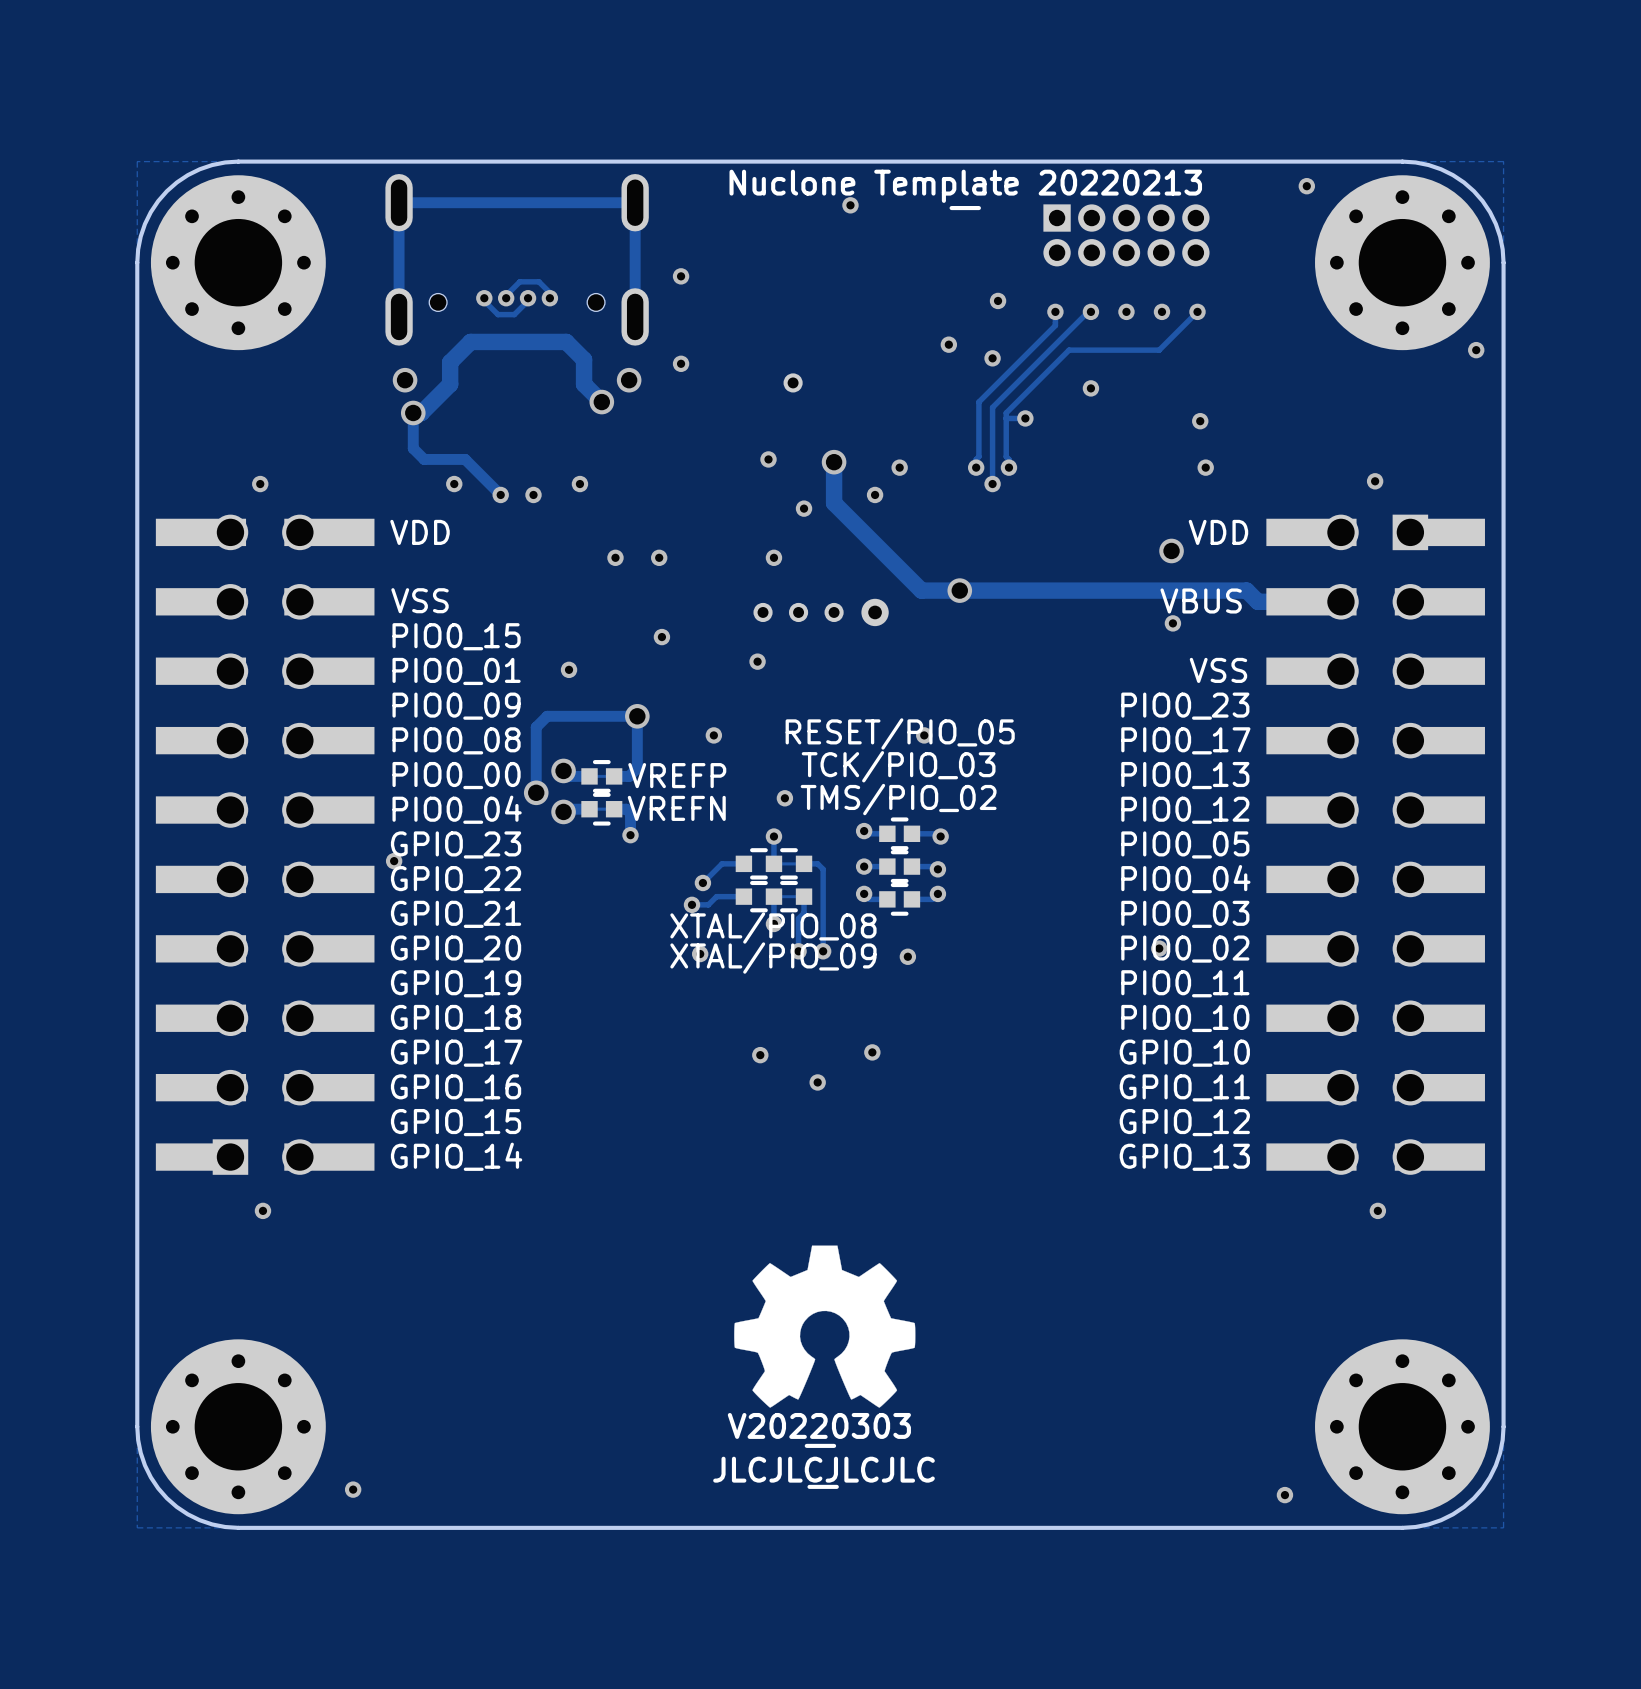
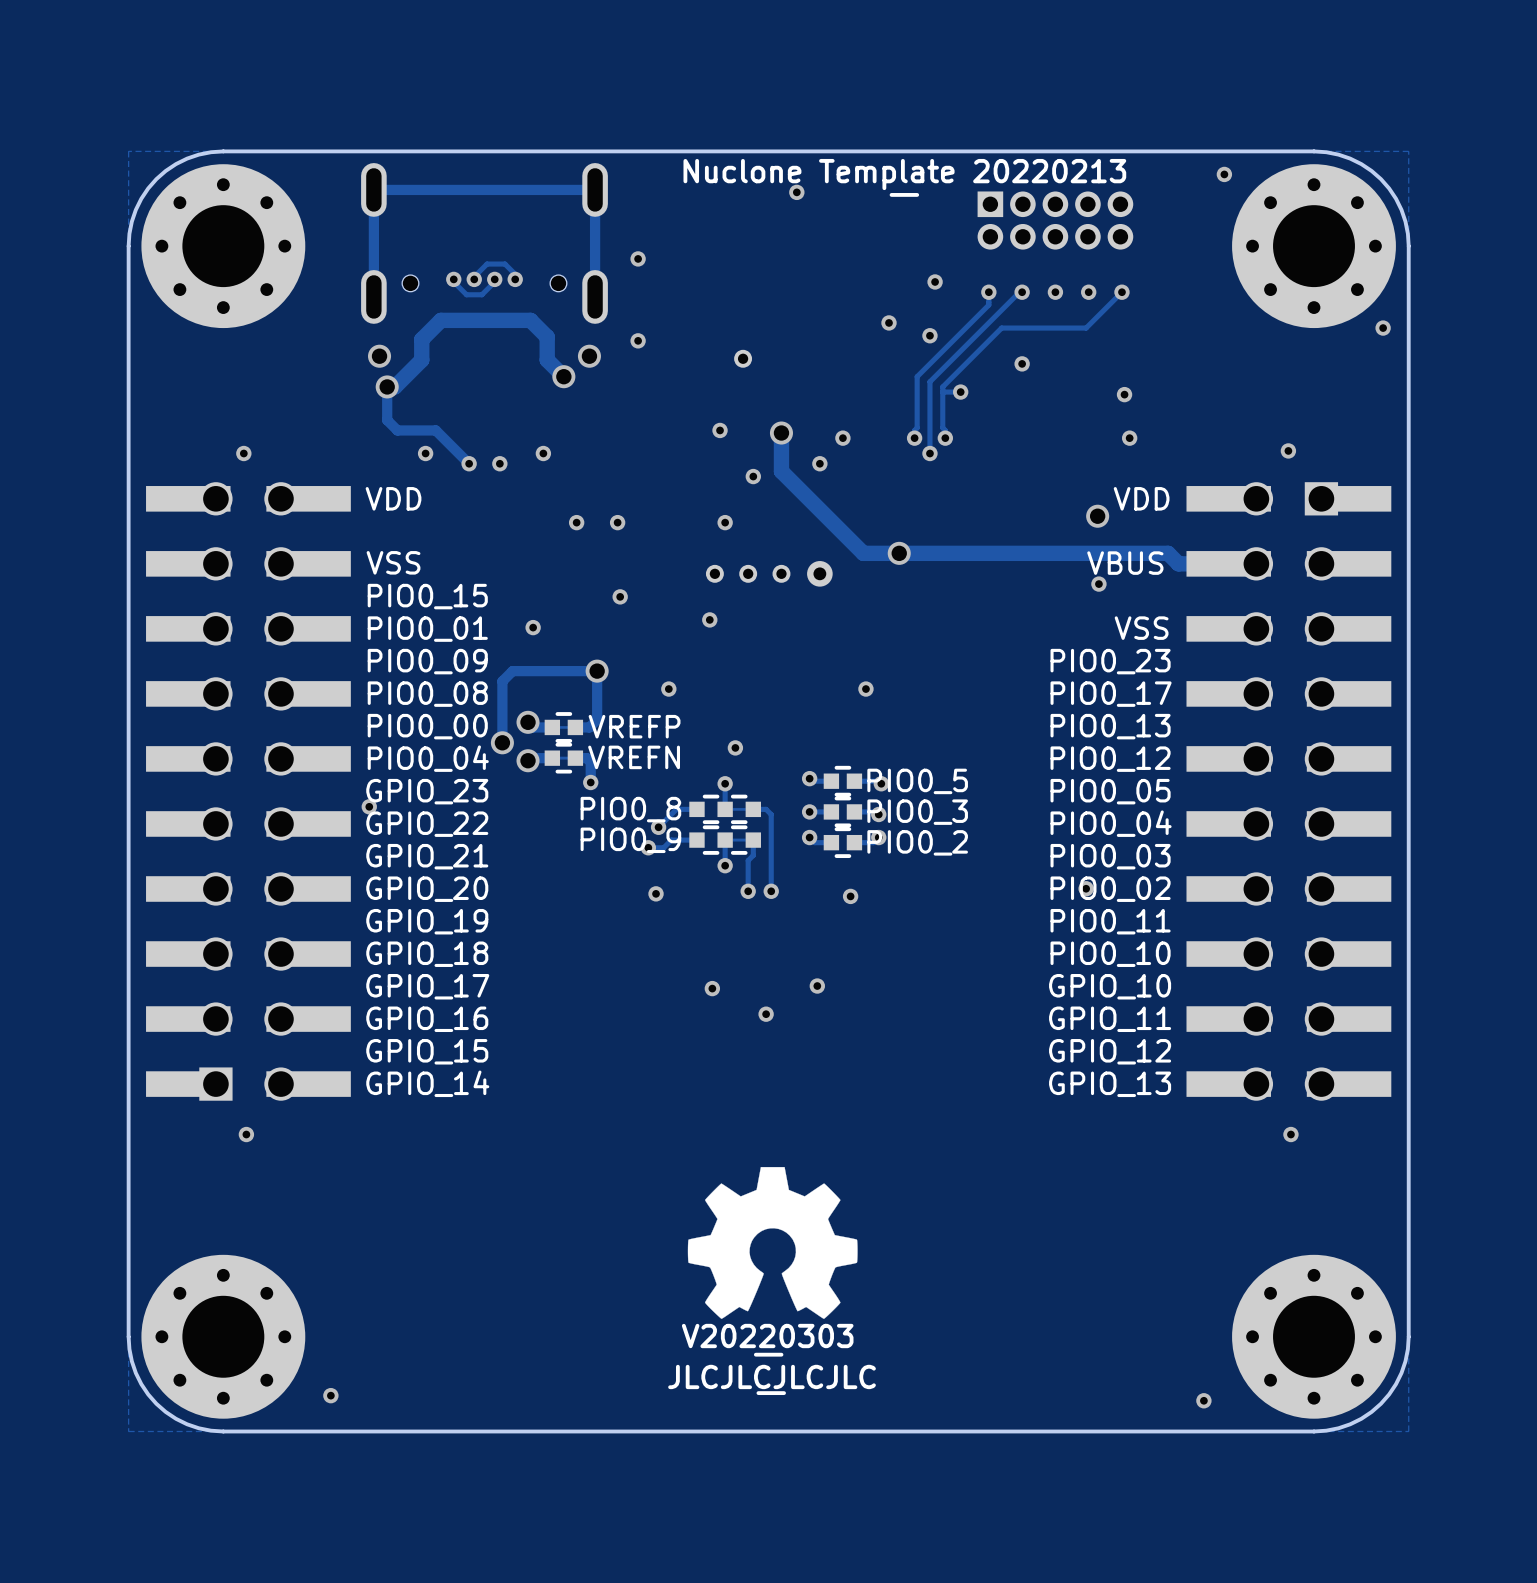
part value: RESET/PIO_05 (900, 733) -> PIO0_5 (917, 781)
part value: TCK/PIO_03 (898, 766) -> PIO0_3 (917, 812)
part value: TMS/PIO_02 (898, 799) -> PIO0_2 (917, 842)
part value: XTAL/PIO_08 (773, 927) -> PIO0_8 (630, 809)
part value: XTAL/PIO_09 (773, 958) -> PIO0_9 (630, 840)

